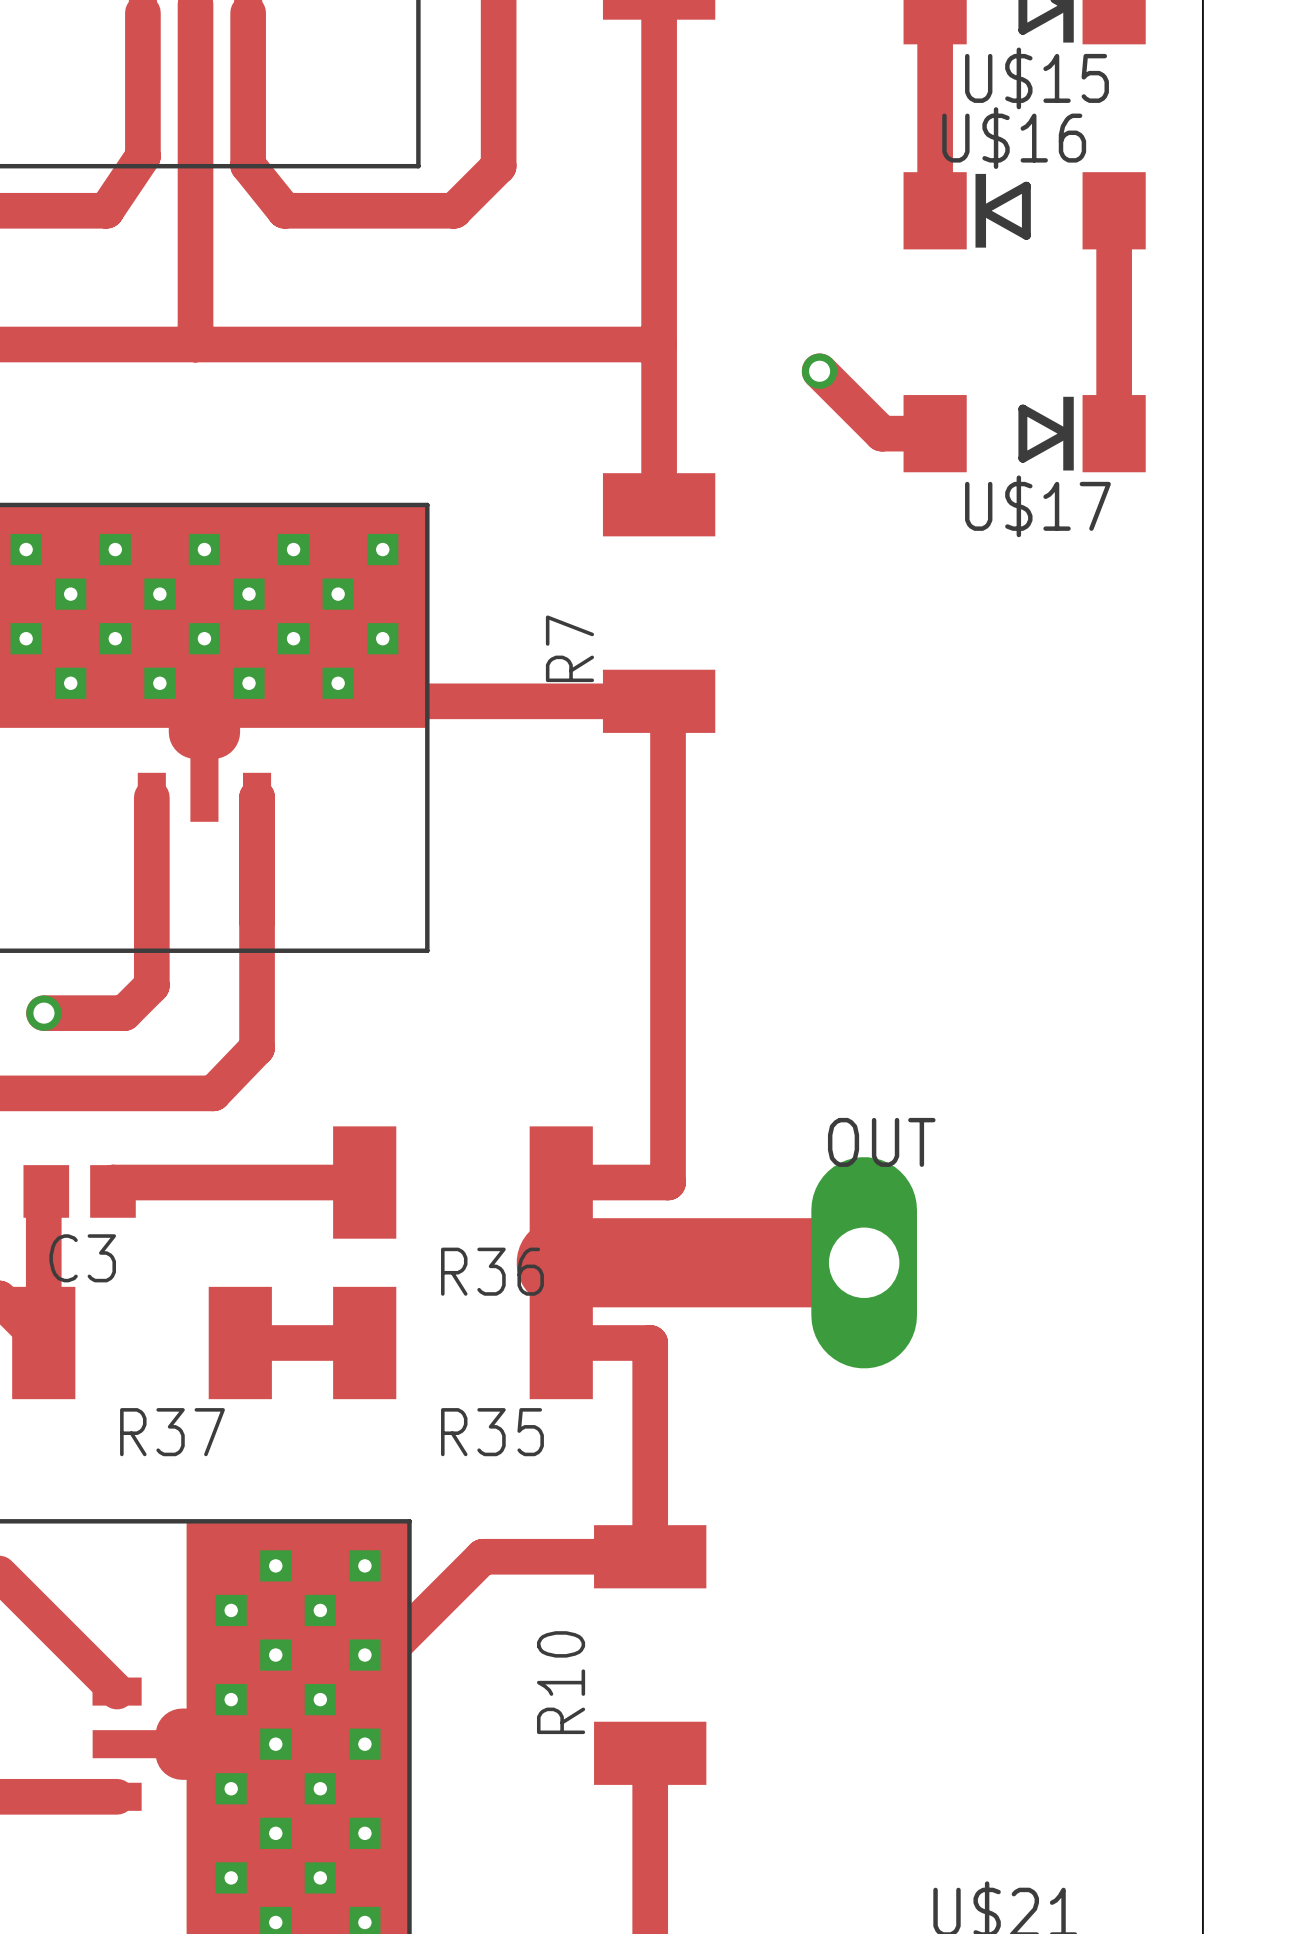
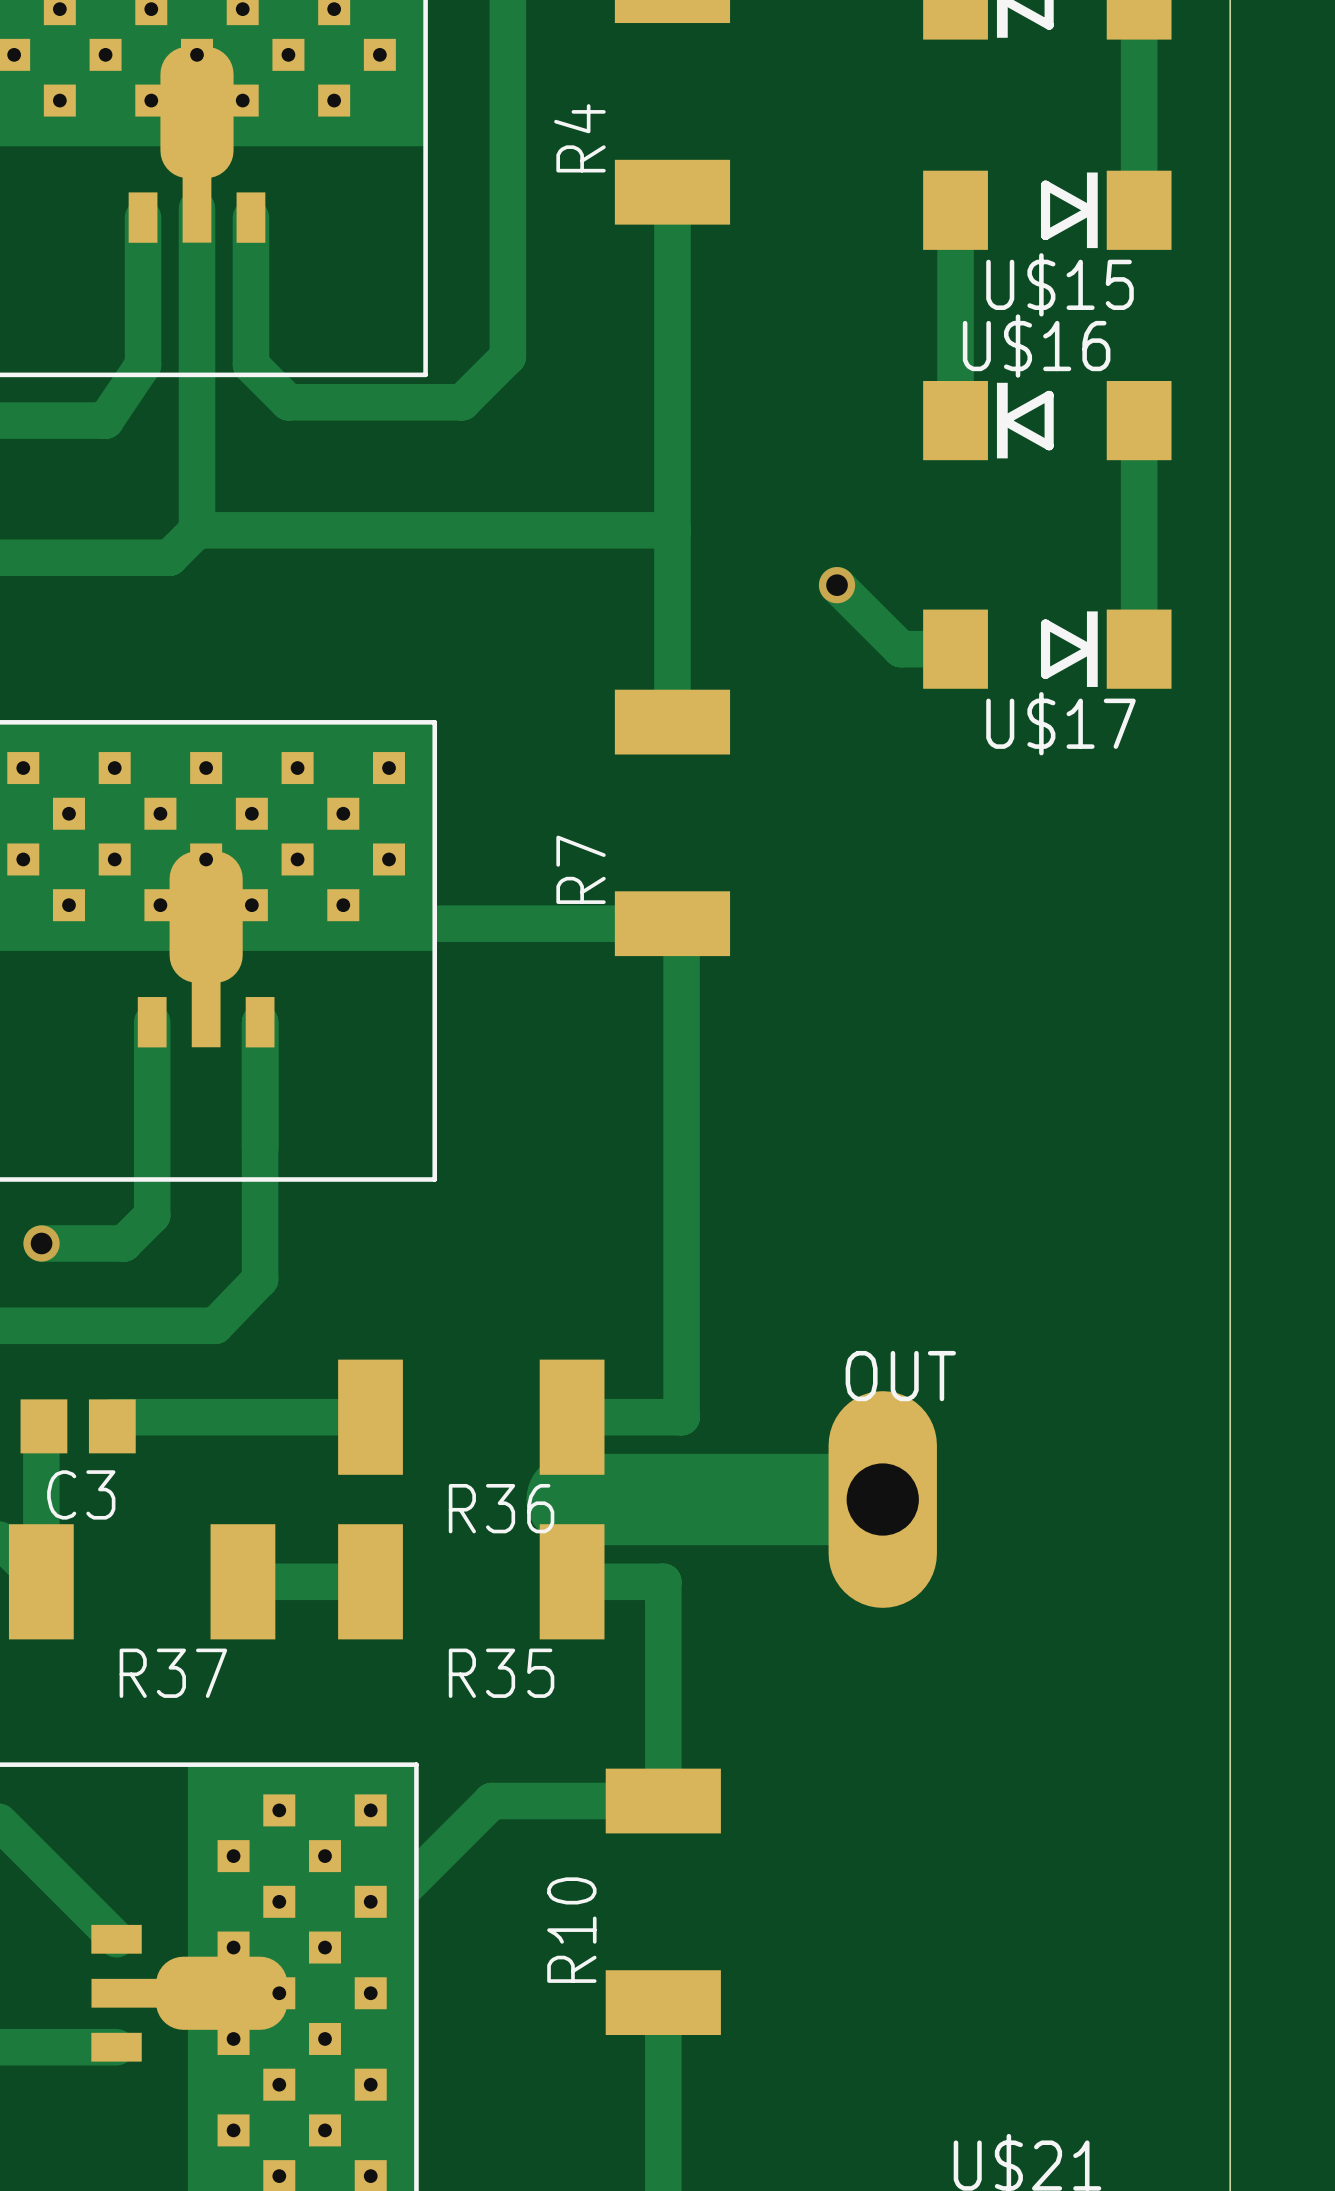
track: (498, 148) (498, 166) (454, 210) (284, 210) (248, 165) (248, 156) -> (507, 356) (462, 402) (288, 402) (250, 364)
track: (168, 344) (659, 344) -> (169, 557) (197, 530) (672, 530)

